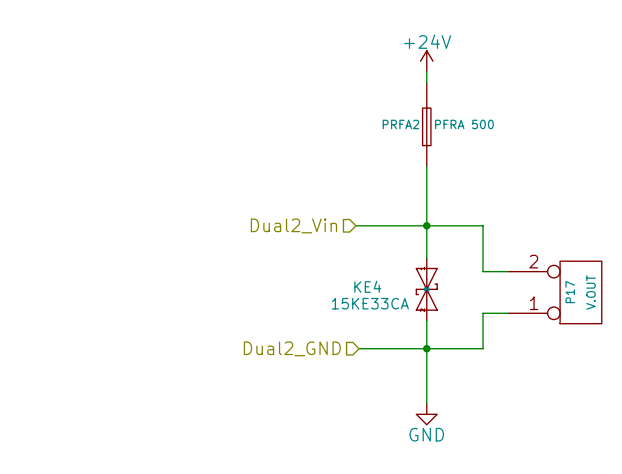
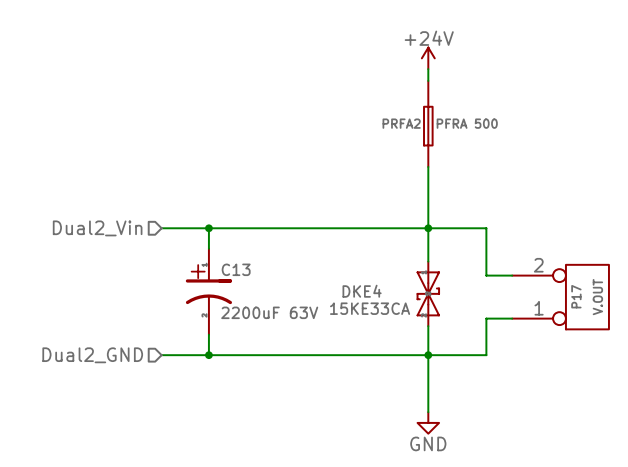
wire: none -> (161, 228) (355, 228)
wire: none -> (208, 228) (208, 248)
junction: none -> (208, 228)
hierarchical label position: Dual2_Vin (293, 225) -> Dual2_Vin (97, 228)
KE4 name: KE4 (367, 286) -> DKE4 (362, 291)
C13: none -> 2200uF 63V (208, 291)
wire: none -> (208, 334) (208, 355)
wire: none -> (161, 355) (358, 355)
junction: none -> (208, 355)
hierarchical label position: Dual2_GND (292, 348) -> Dual2_GND (92, 355)

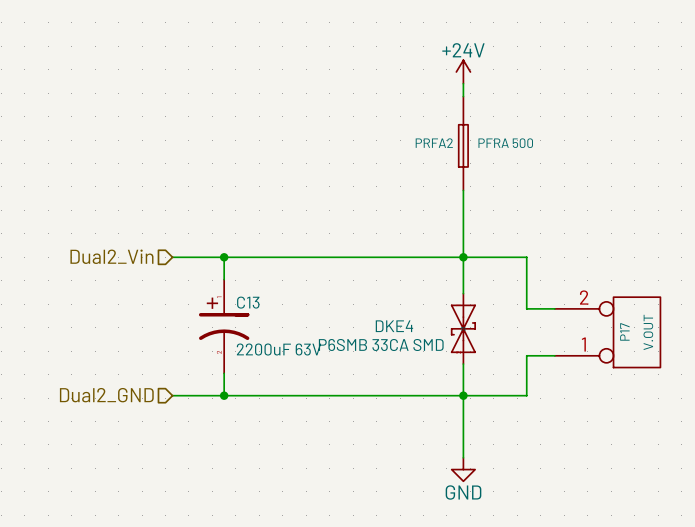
DKE4 value: 15KE33CA (370, 308) -> P6SMB 33CA SMD (381, 345)

